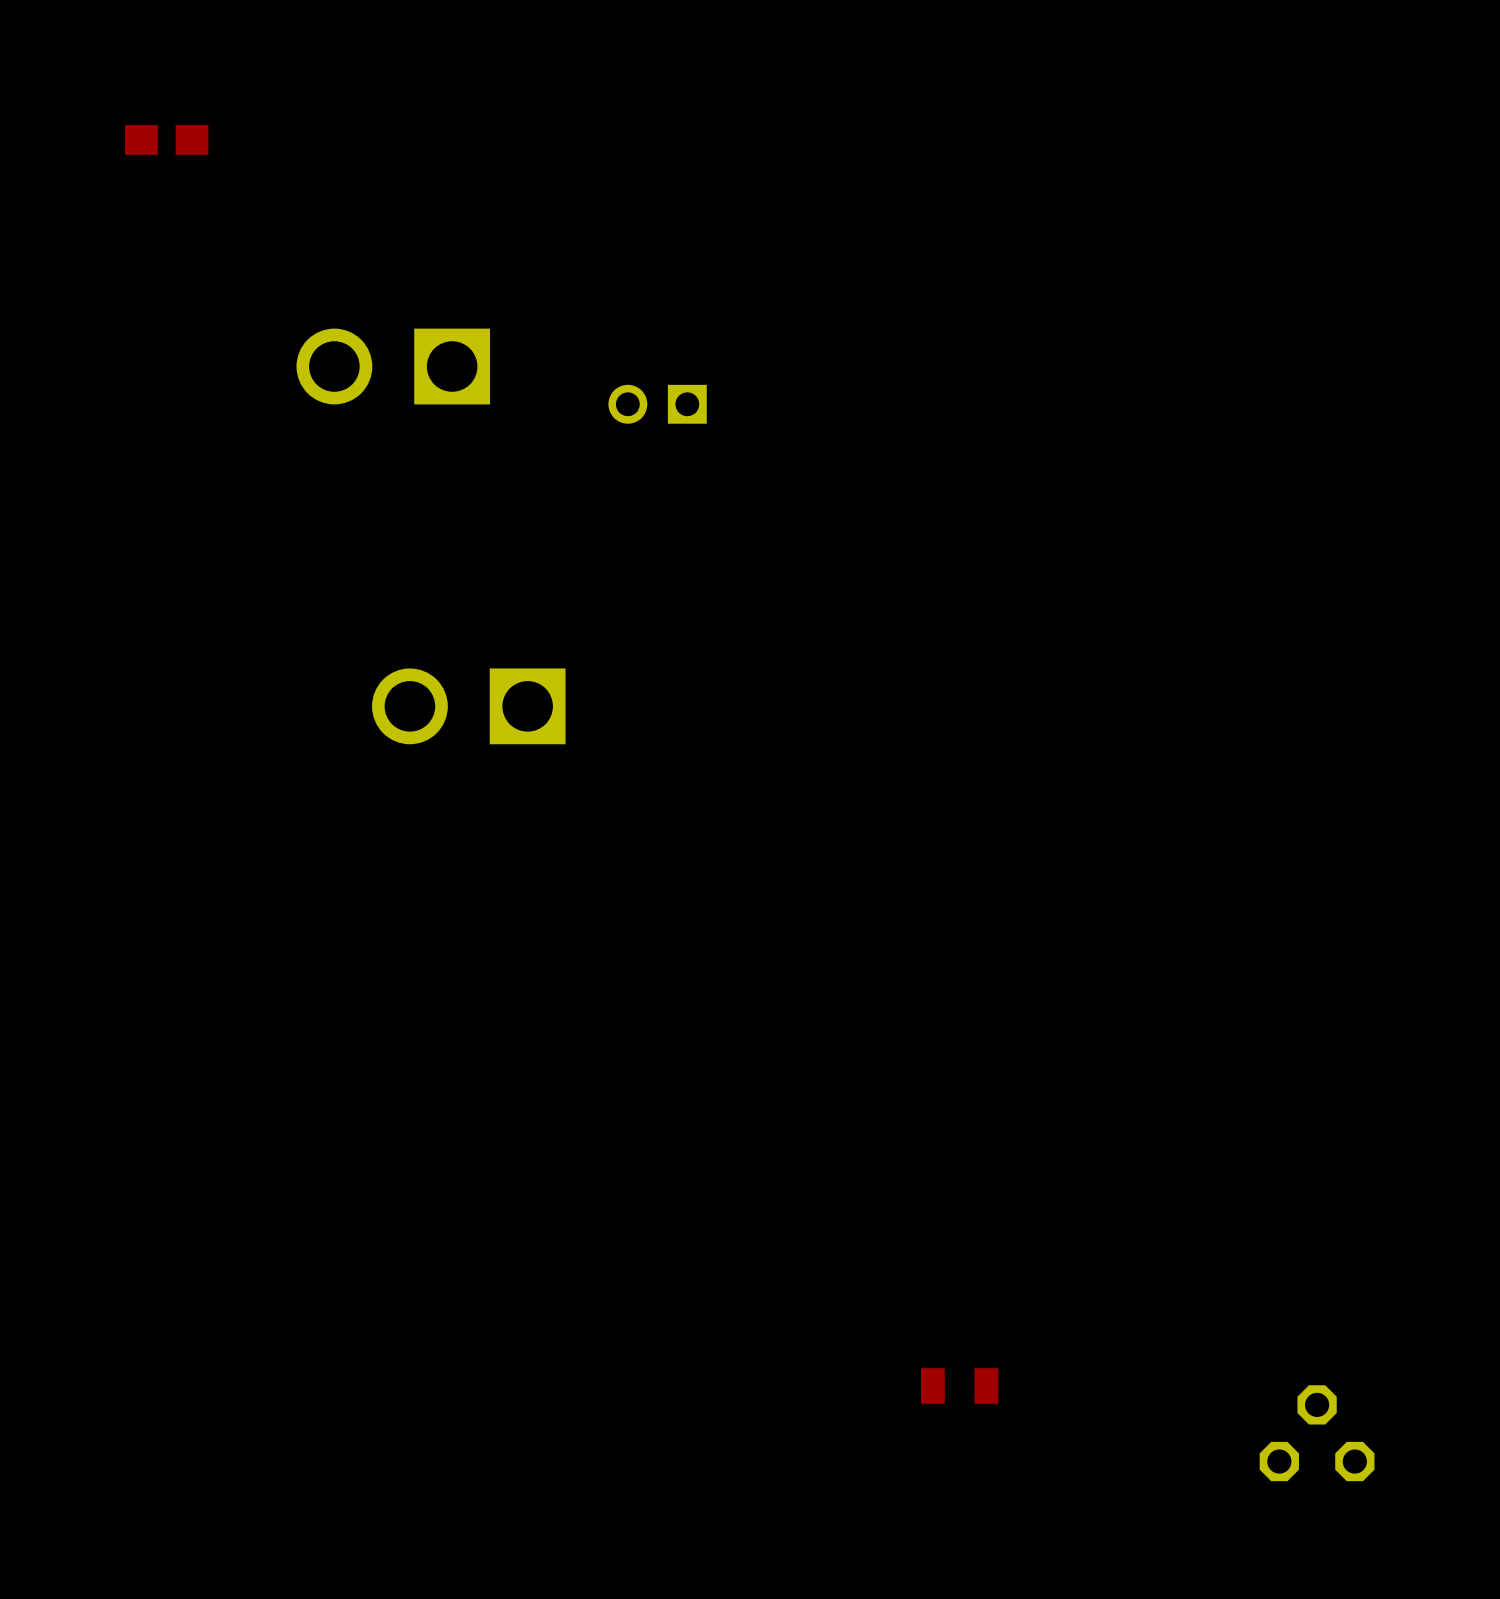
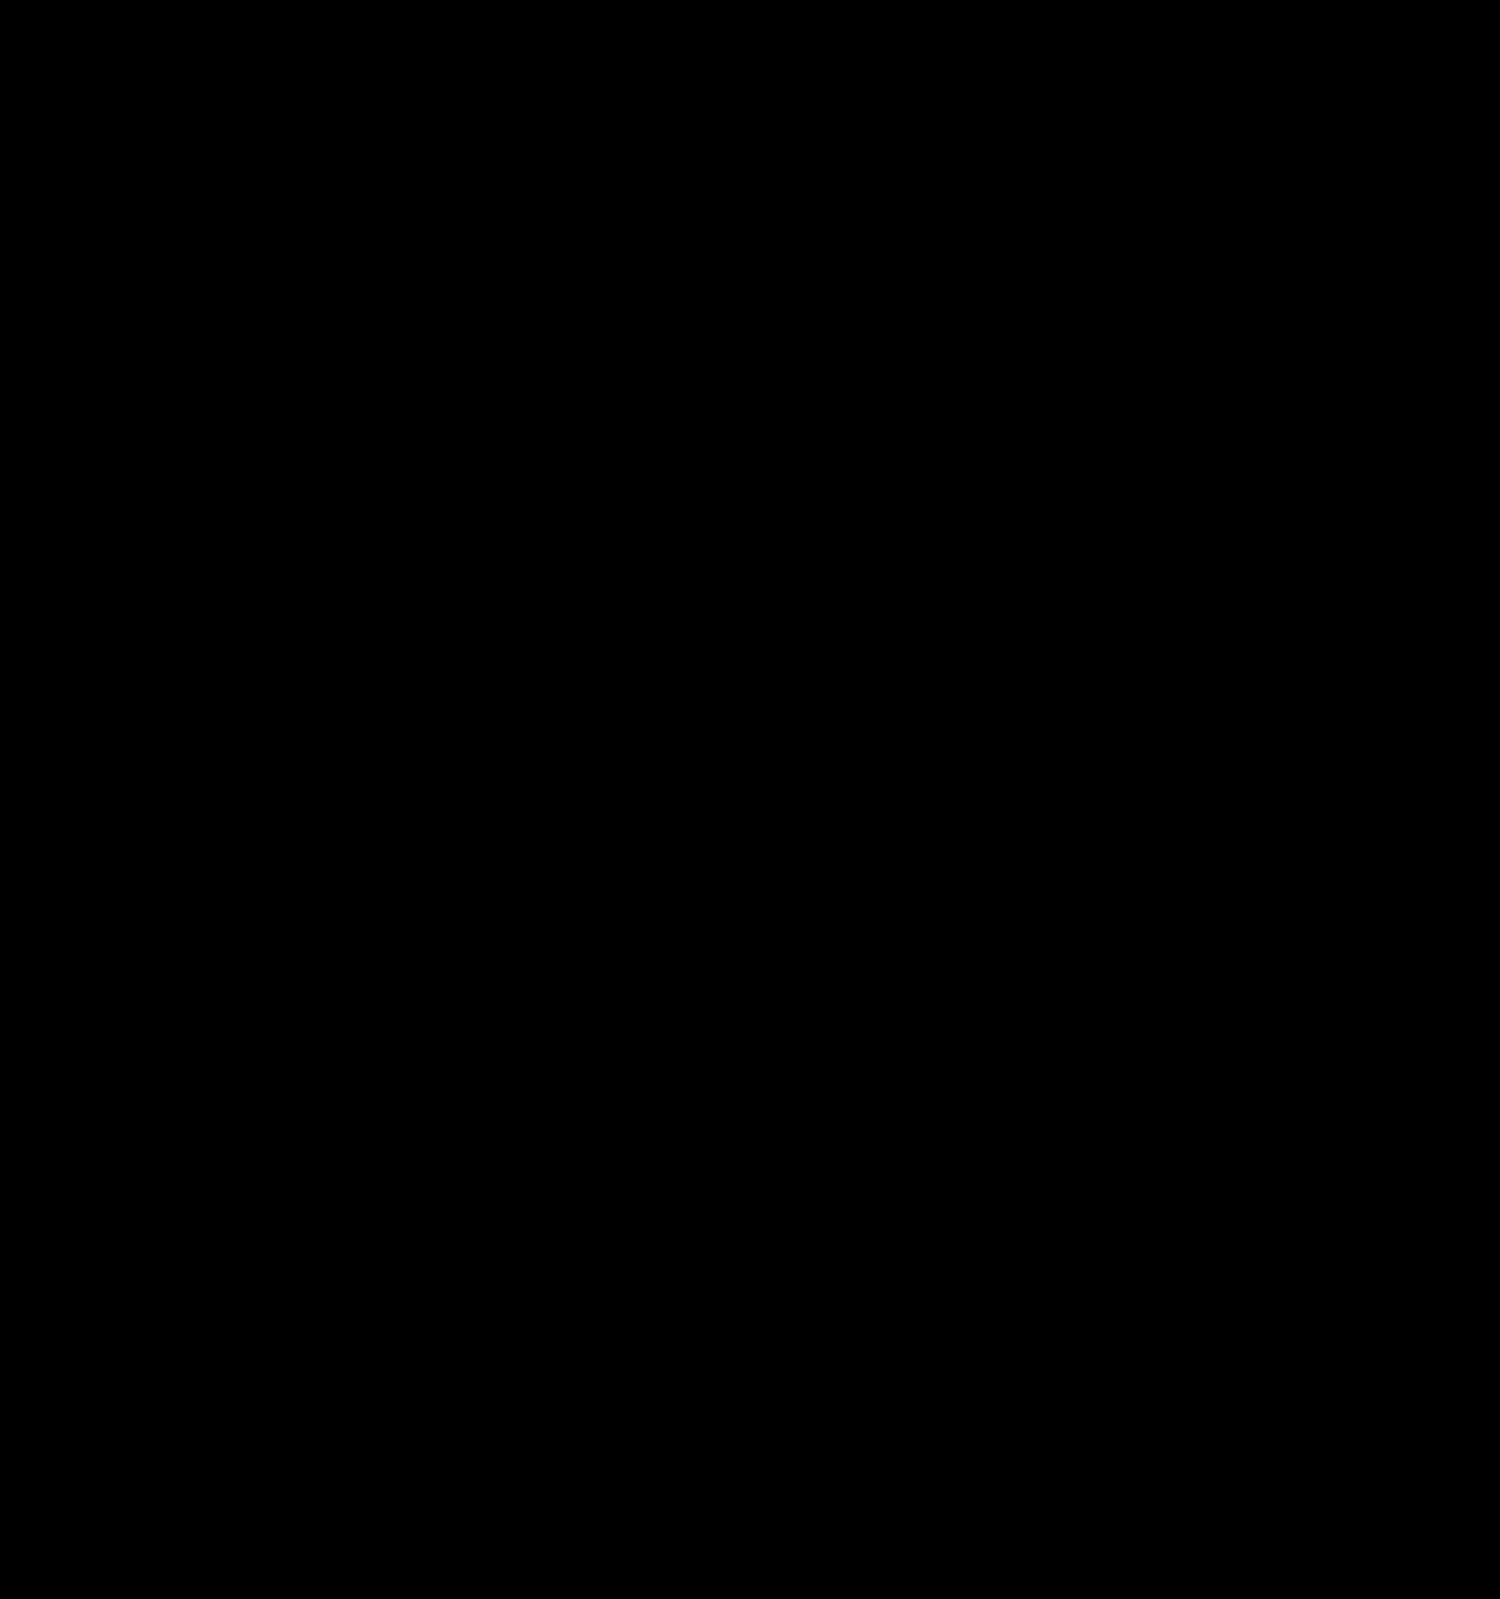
part: (166, 139) -> none
part: (393, 366) -> none
part: (657, 404) -> none
part: (468, 706) -> none
part: (959, 1386) -> none
part: (1317, 1433) -> none

